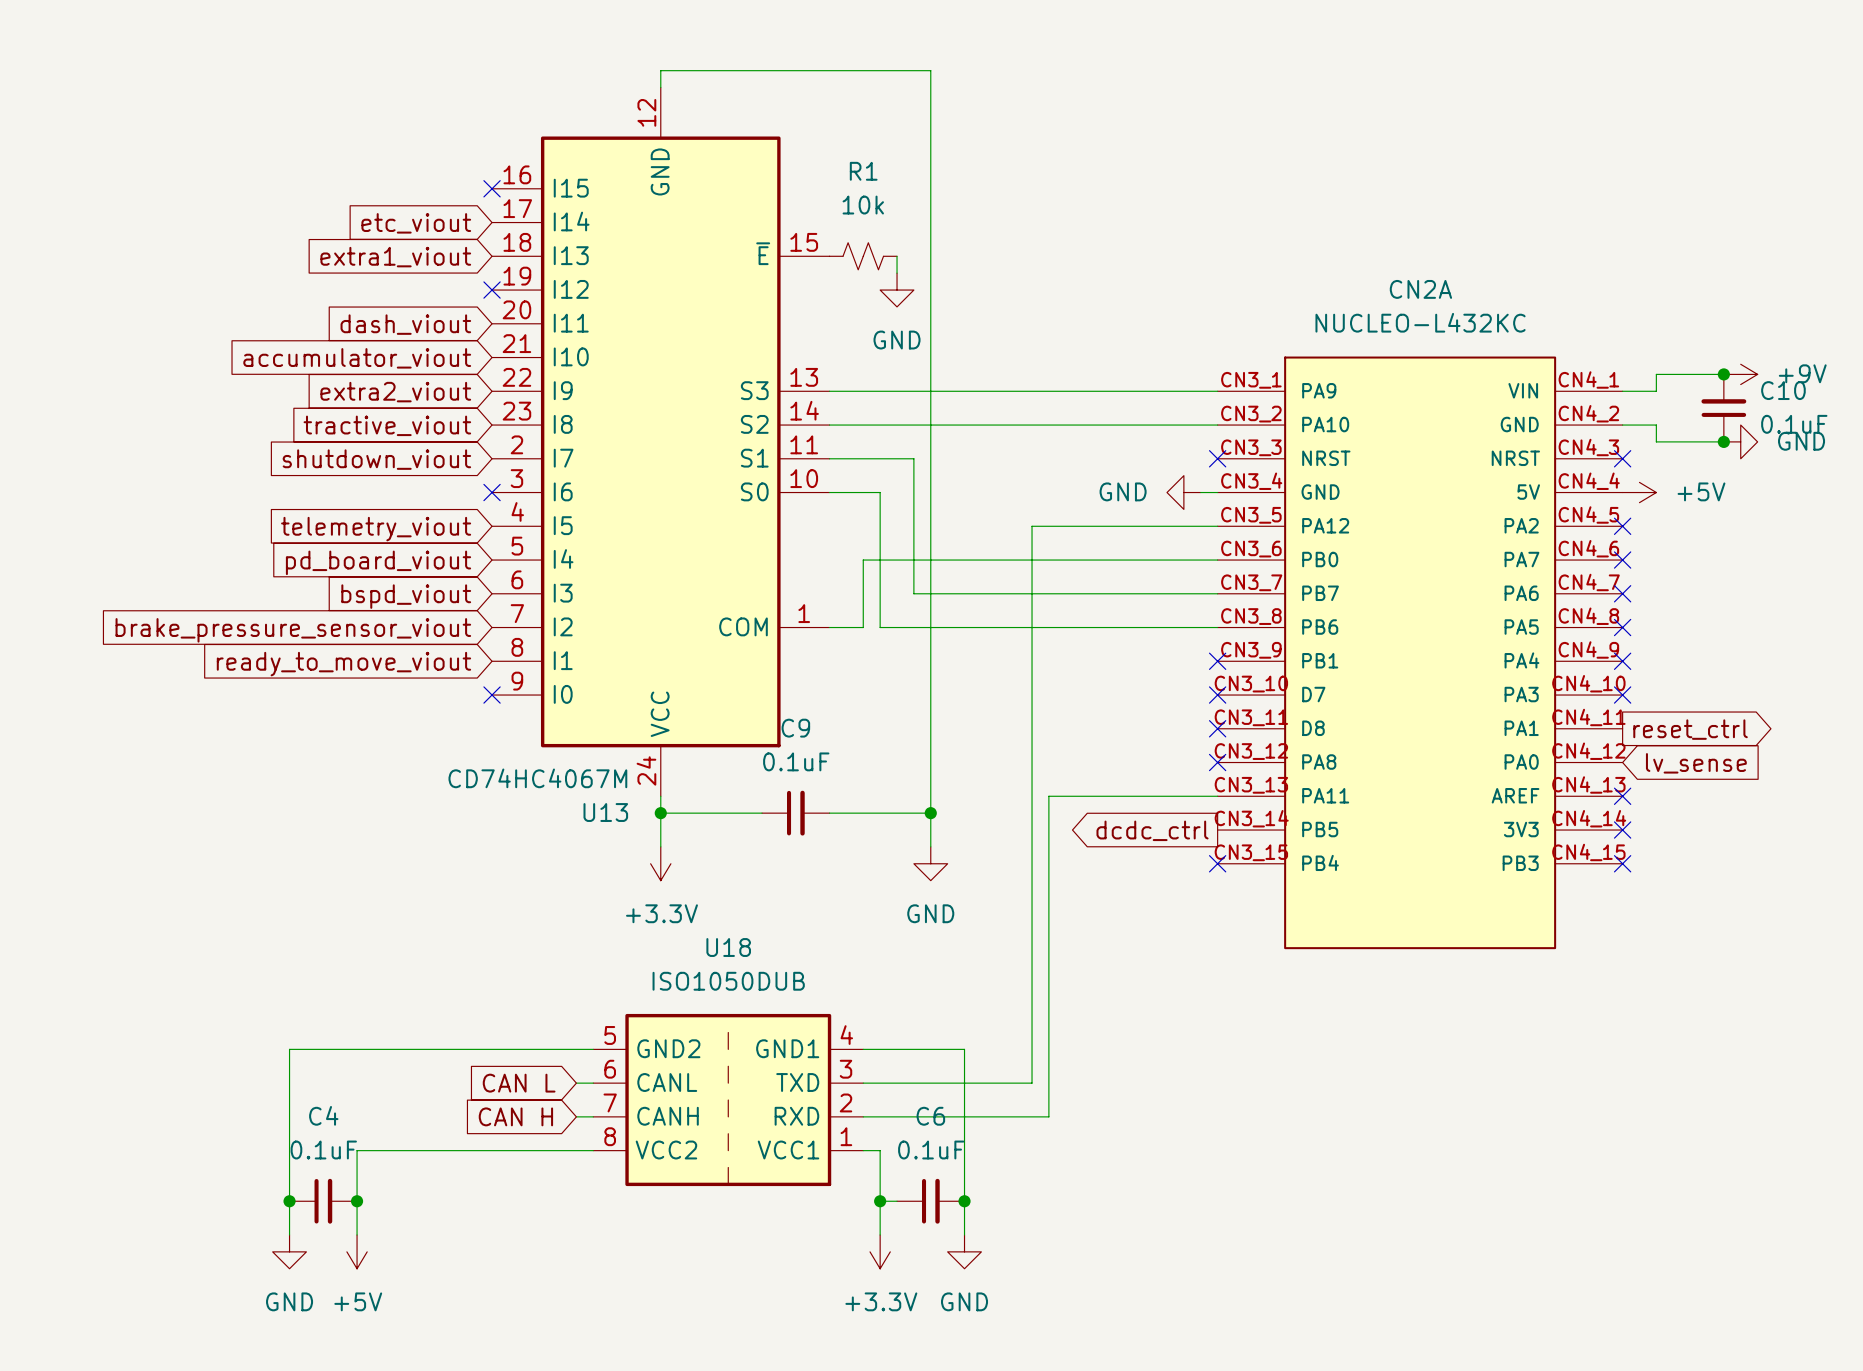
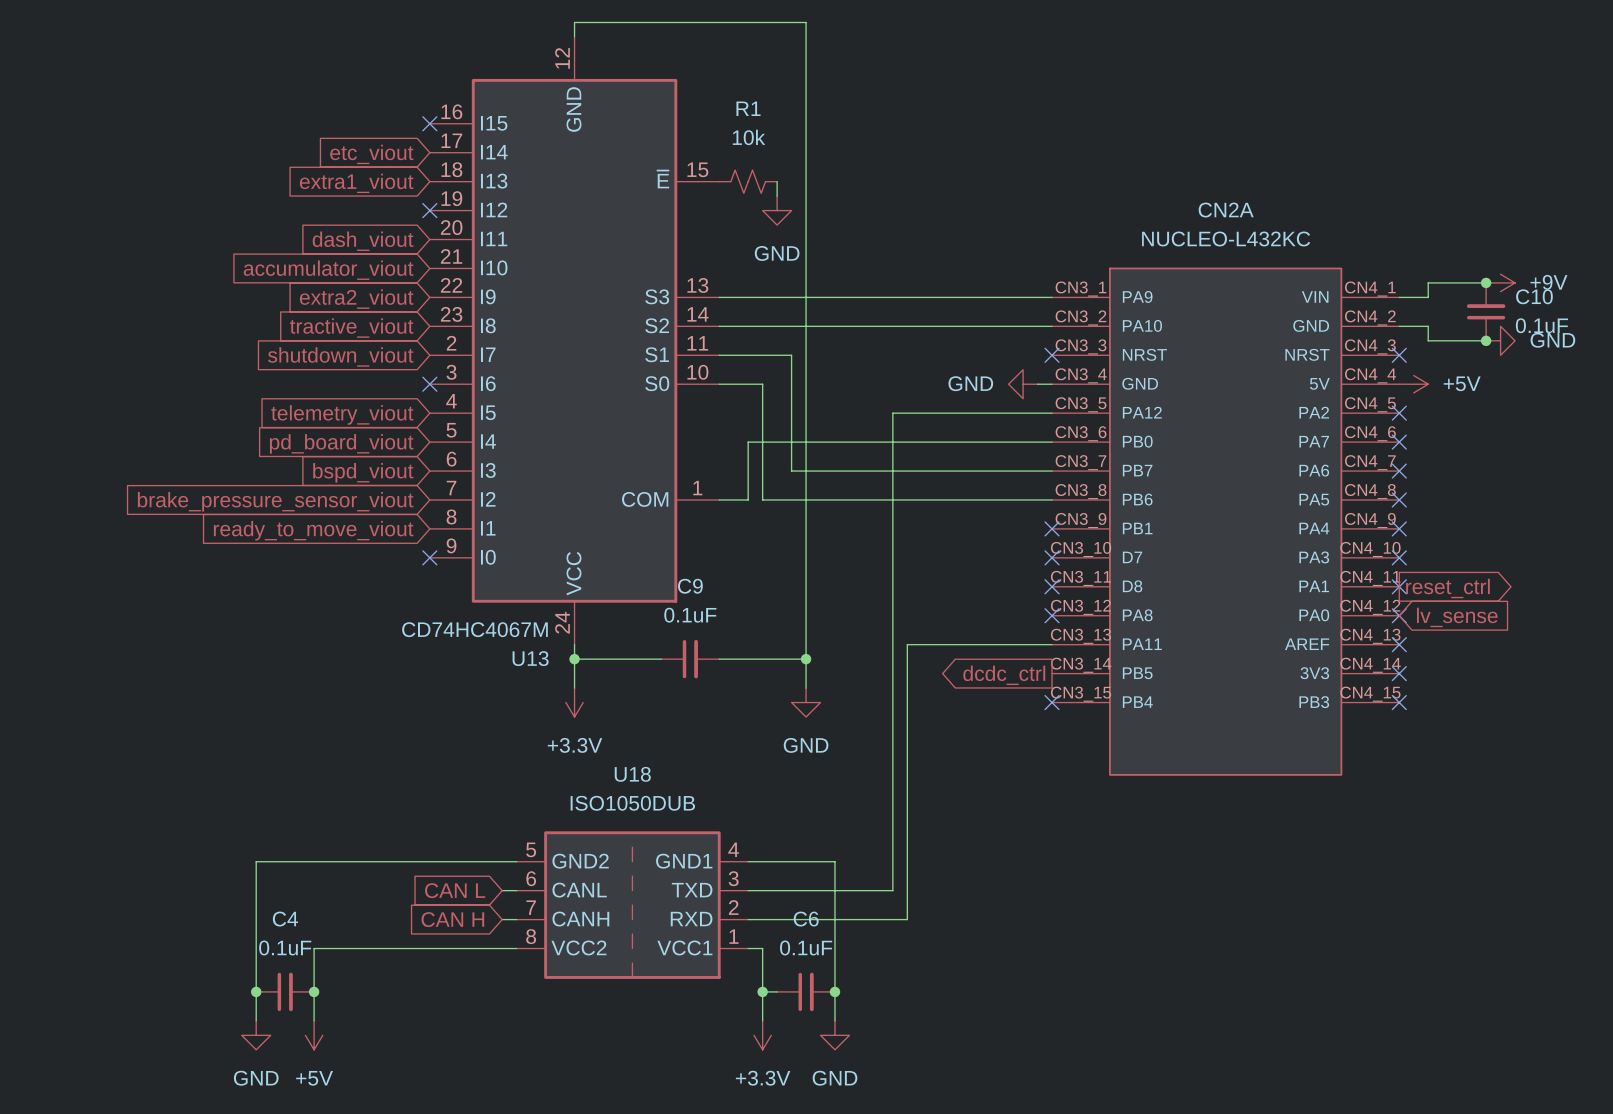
no-connect mark: none -> (1399, 586)
no-connect mark: none -> (1399, 615)

